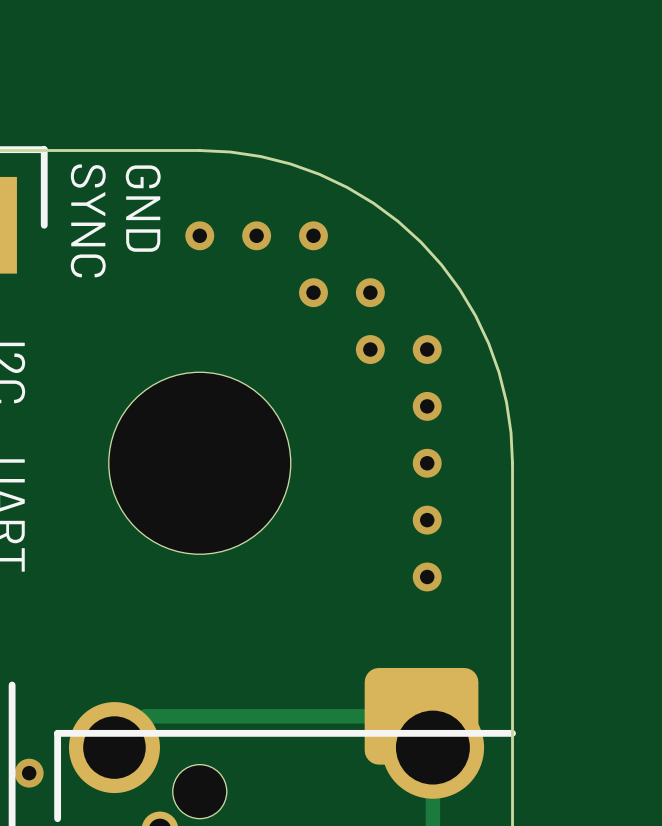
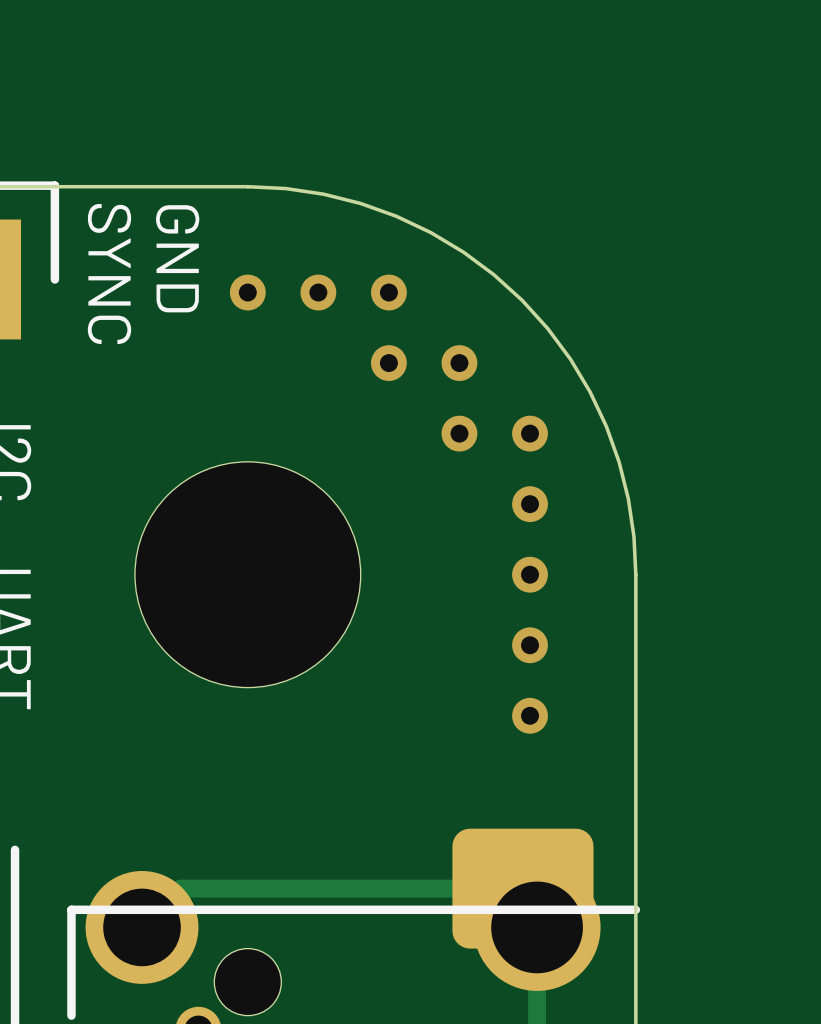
via: (29, 773) -> none

